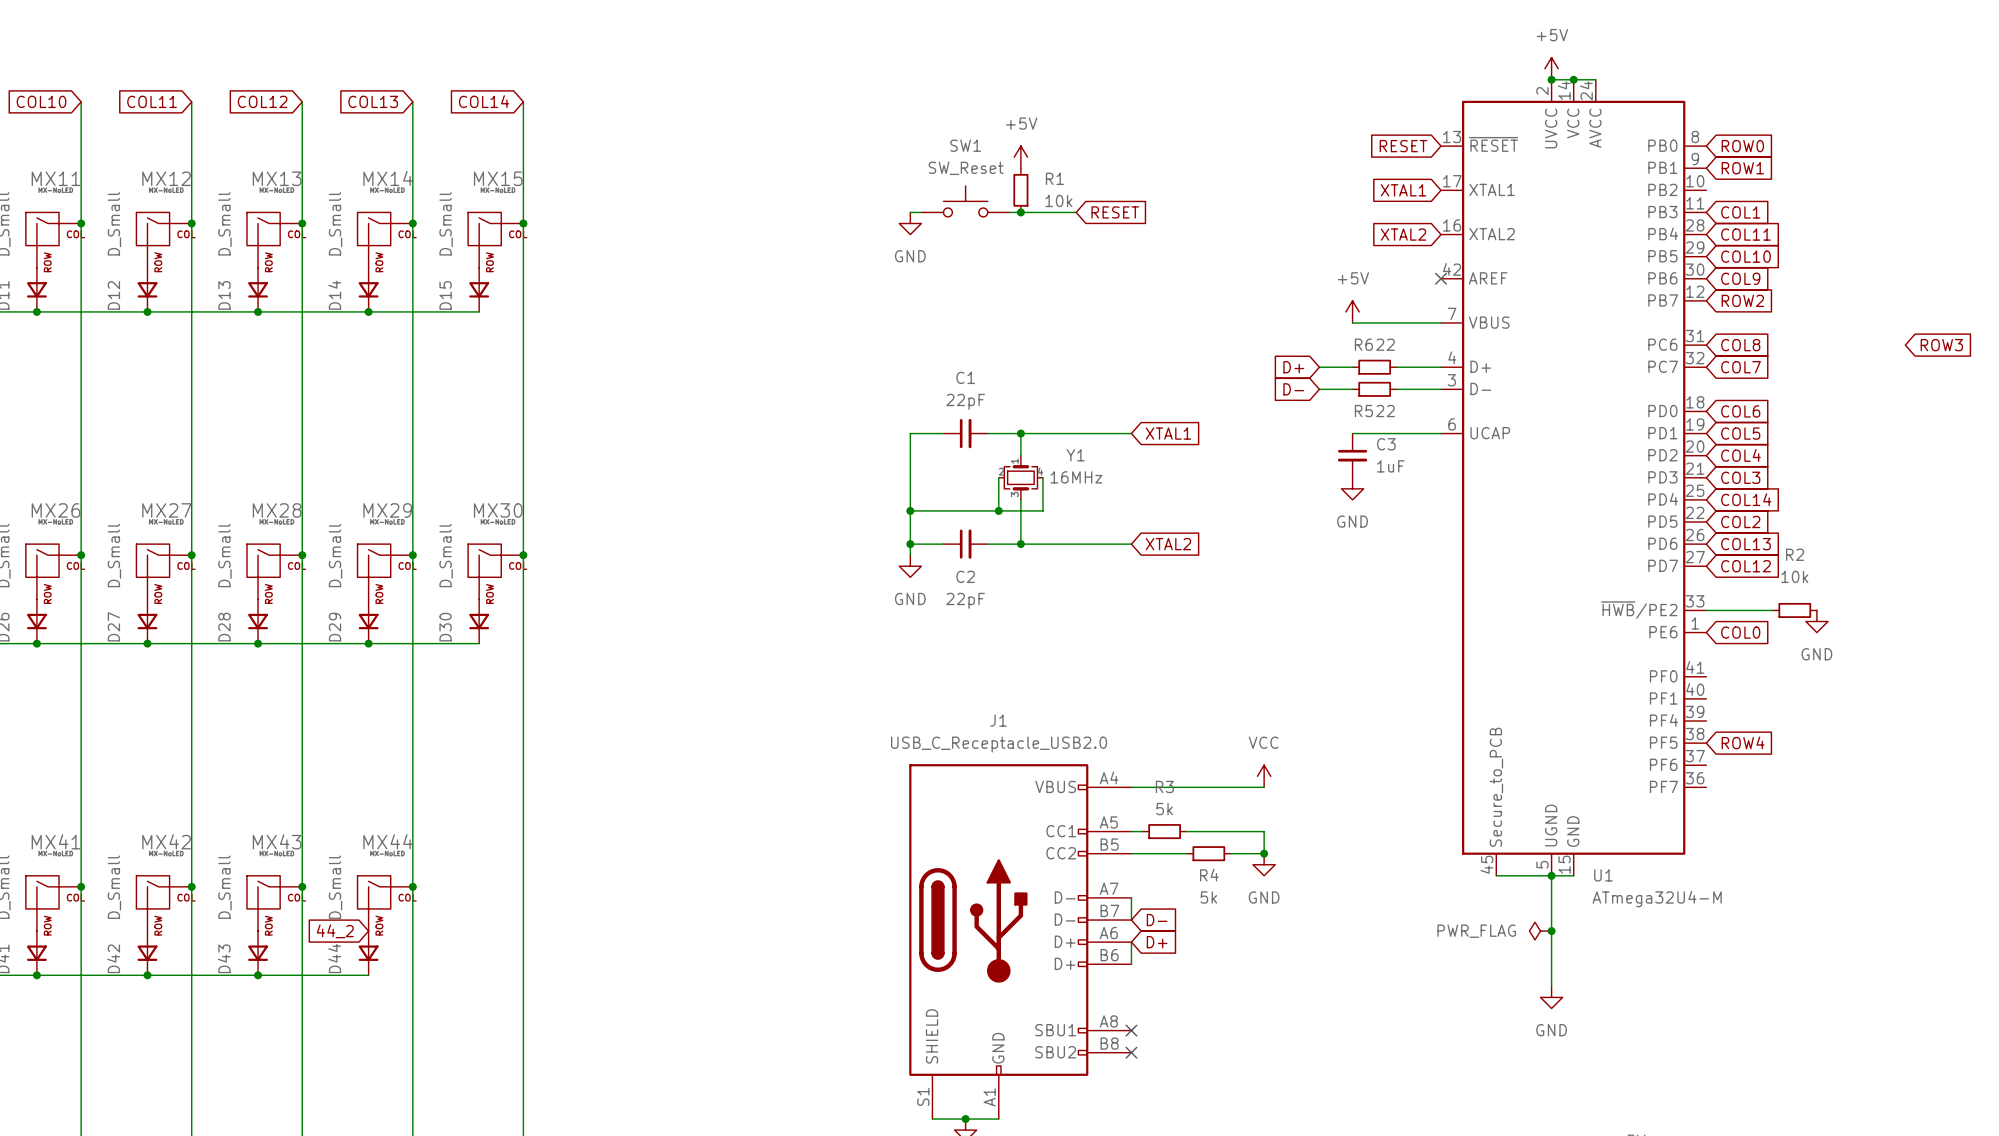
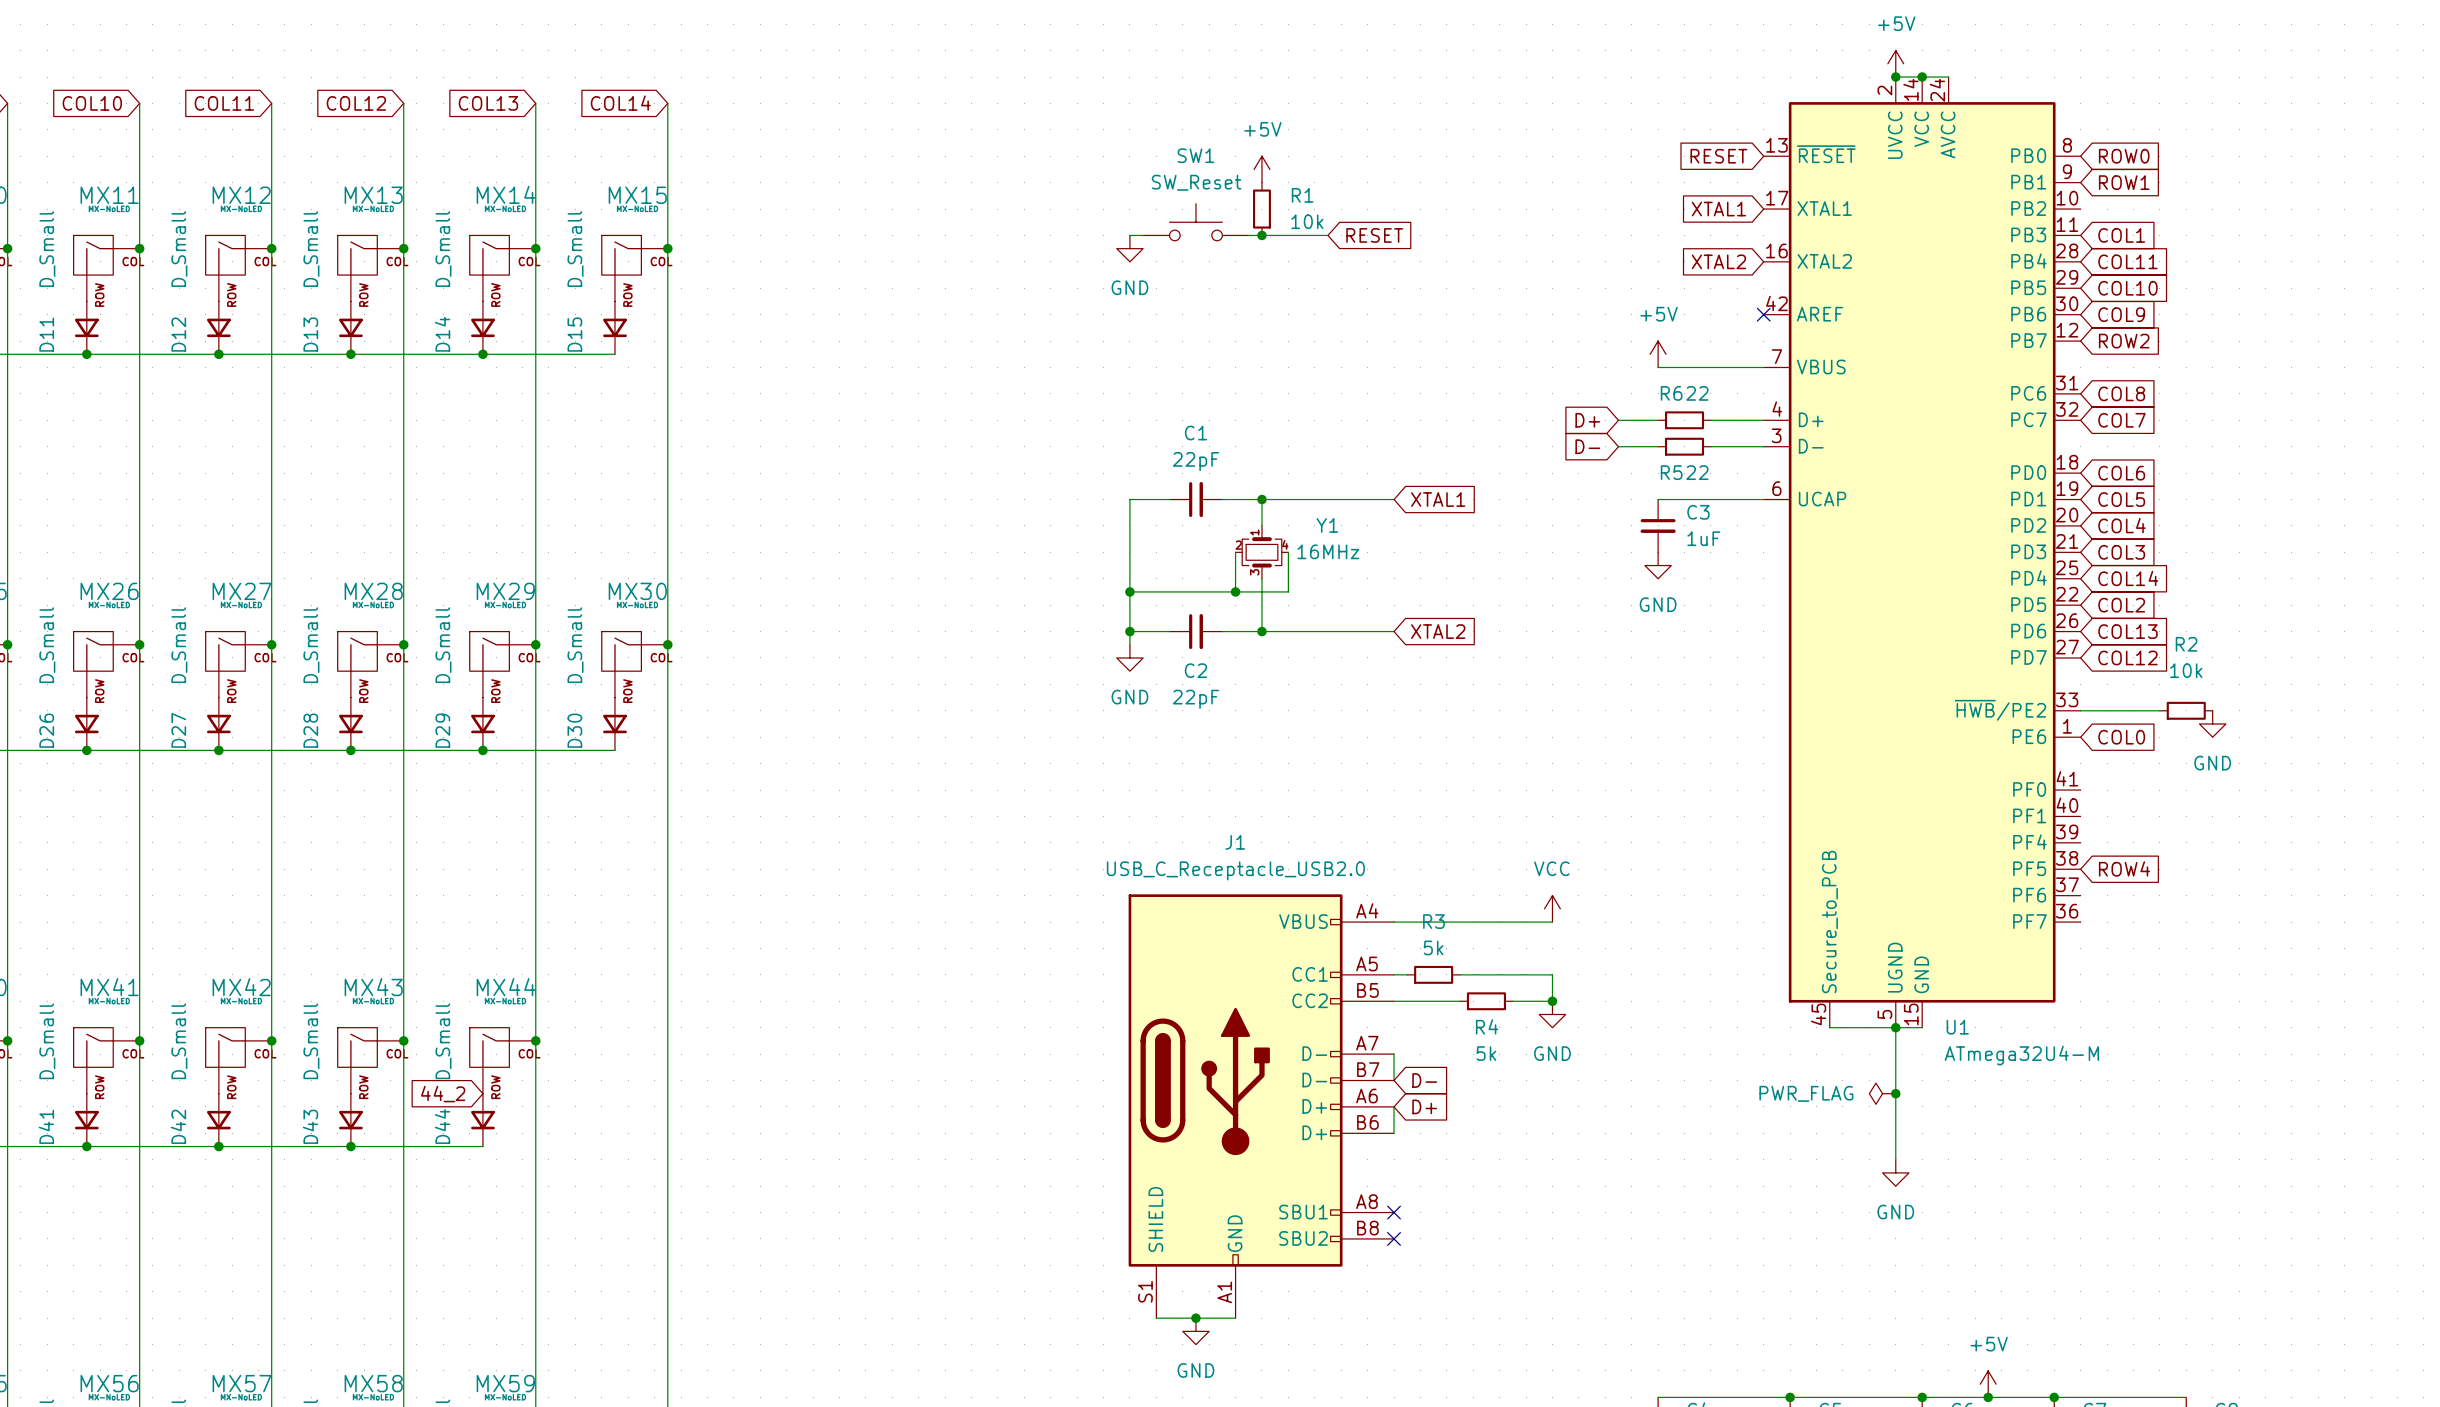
global label: ROW3 (1941, 345) -> none

